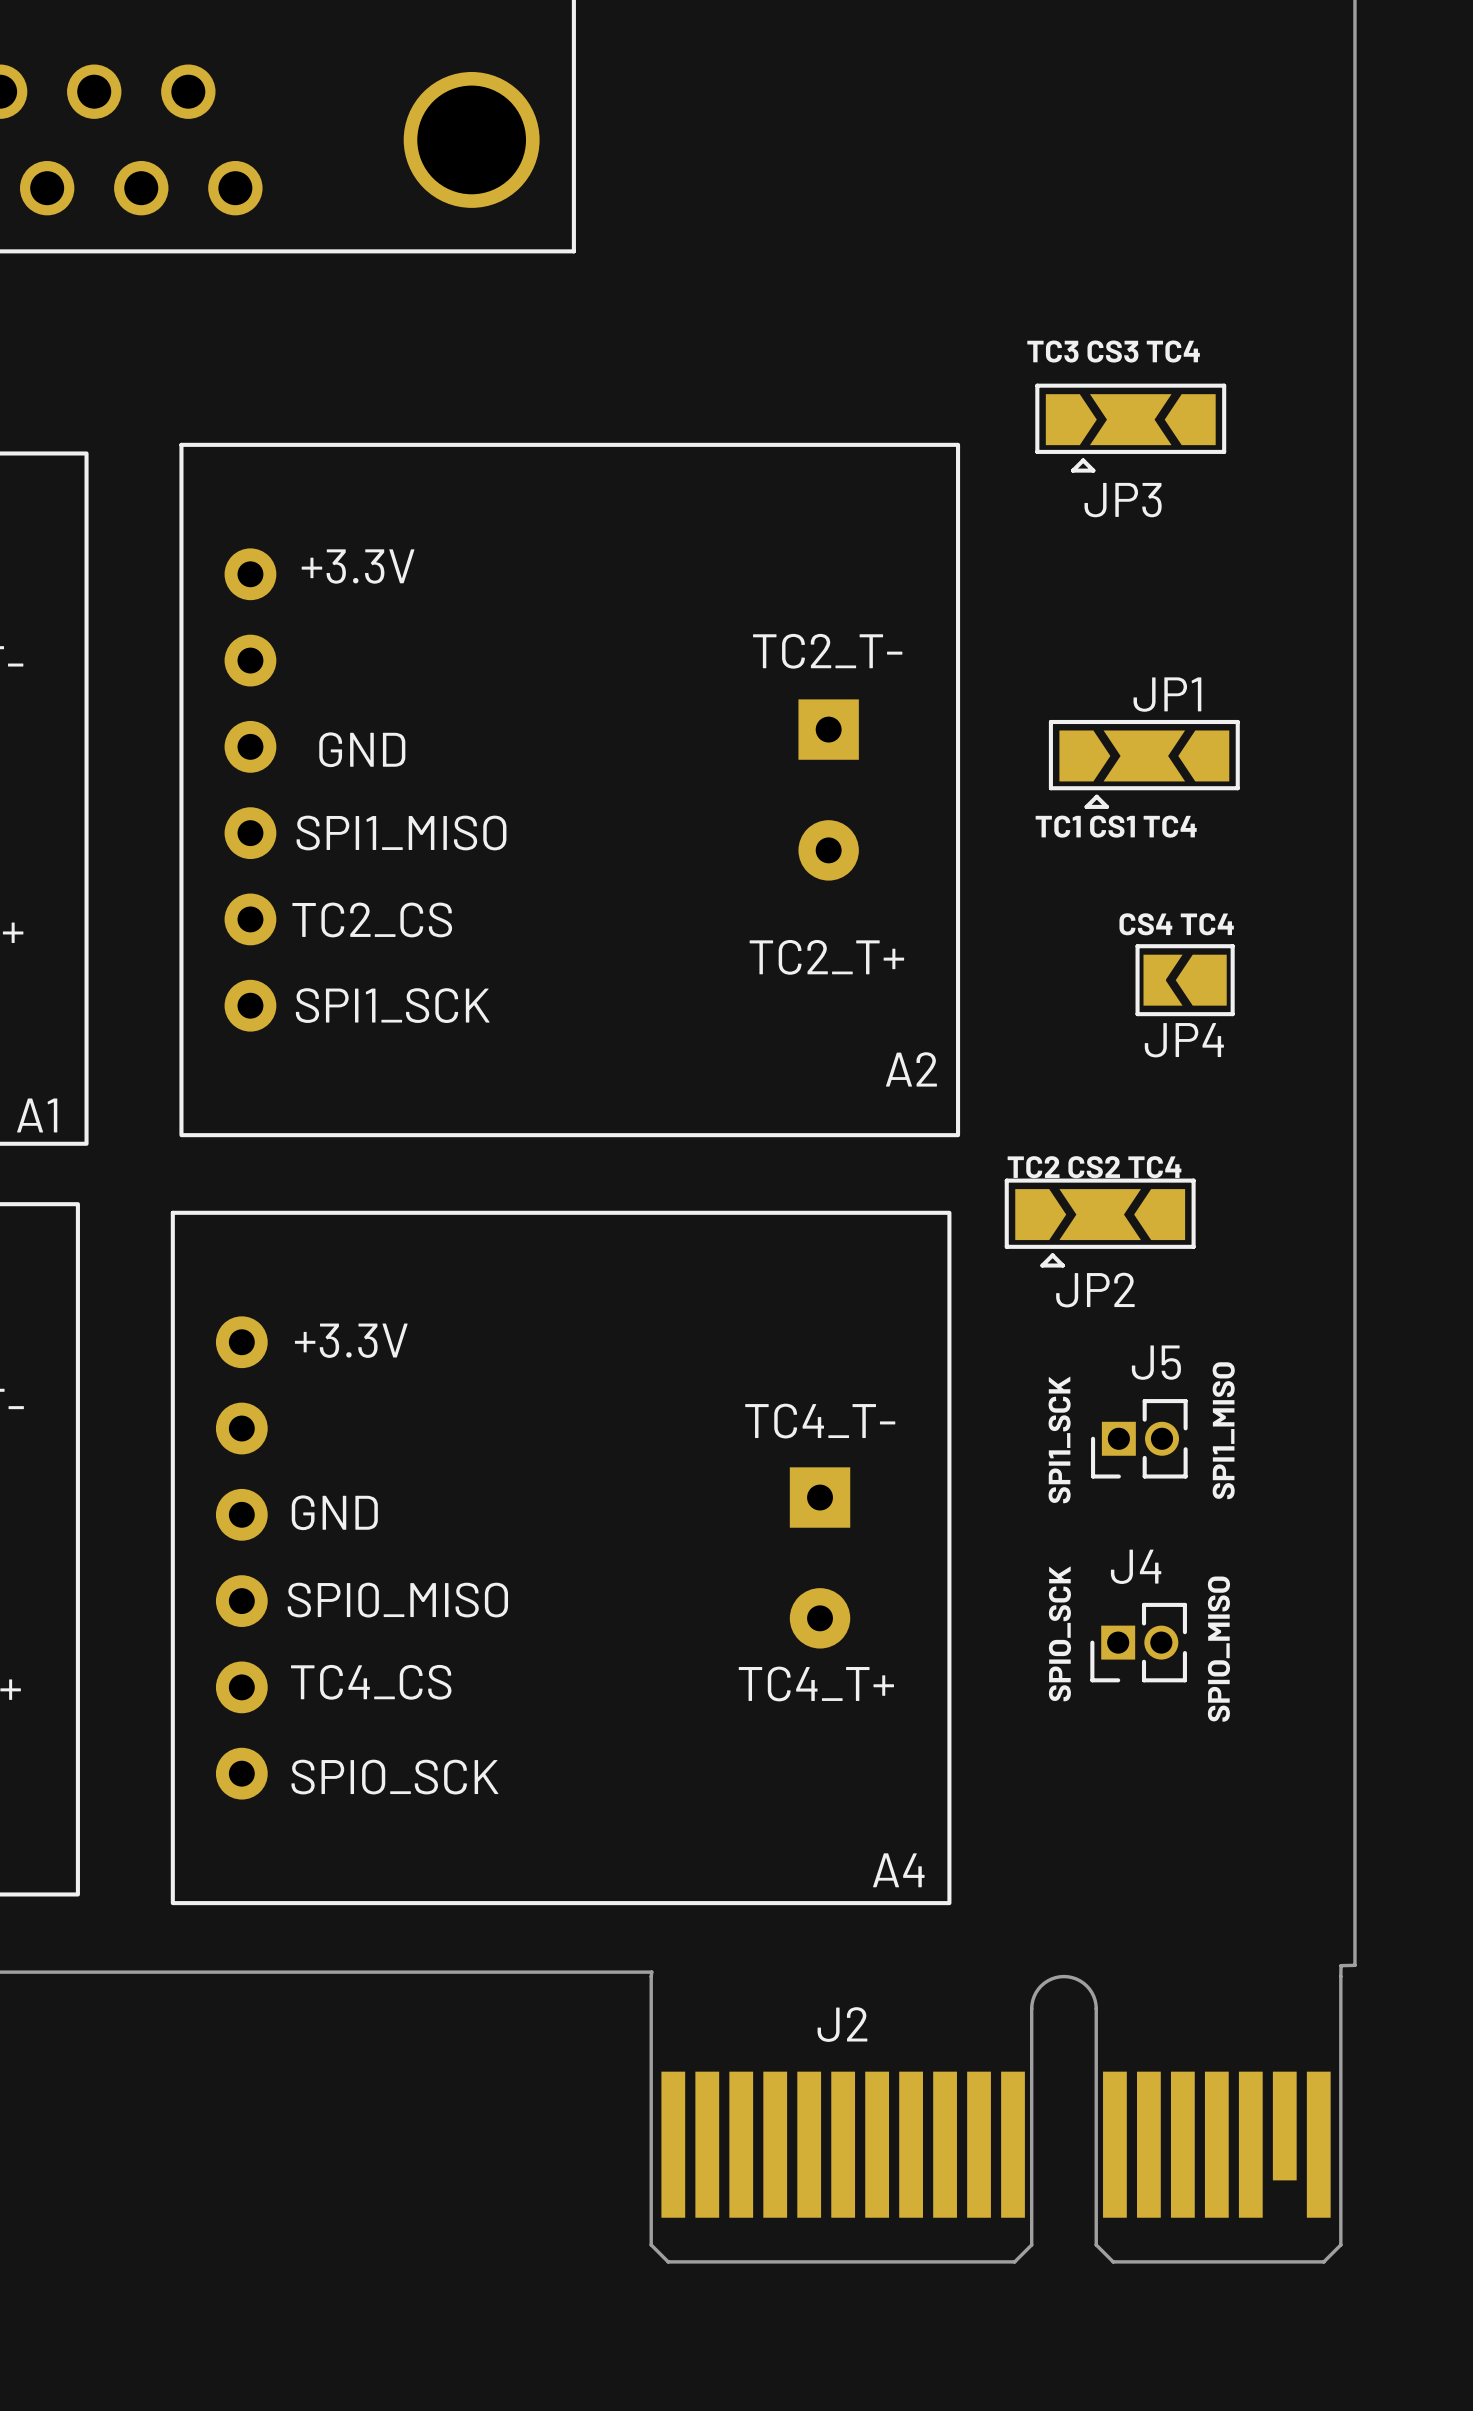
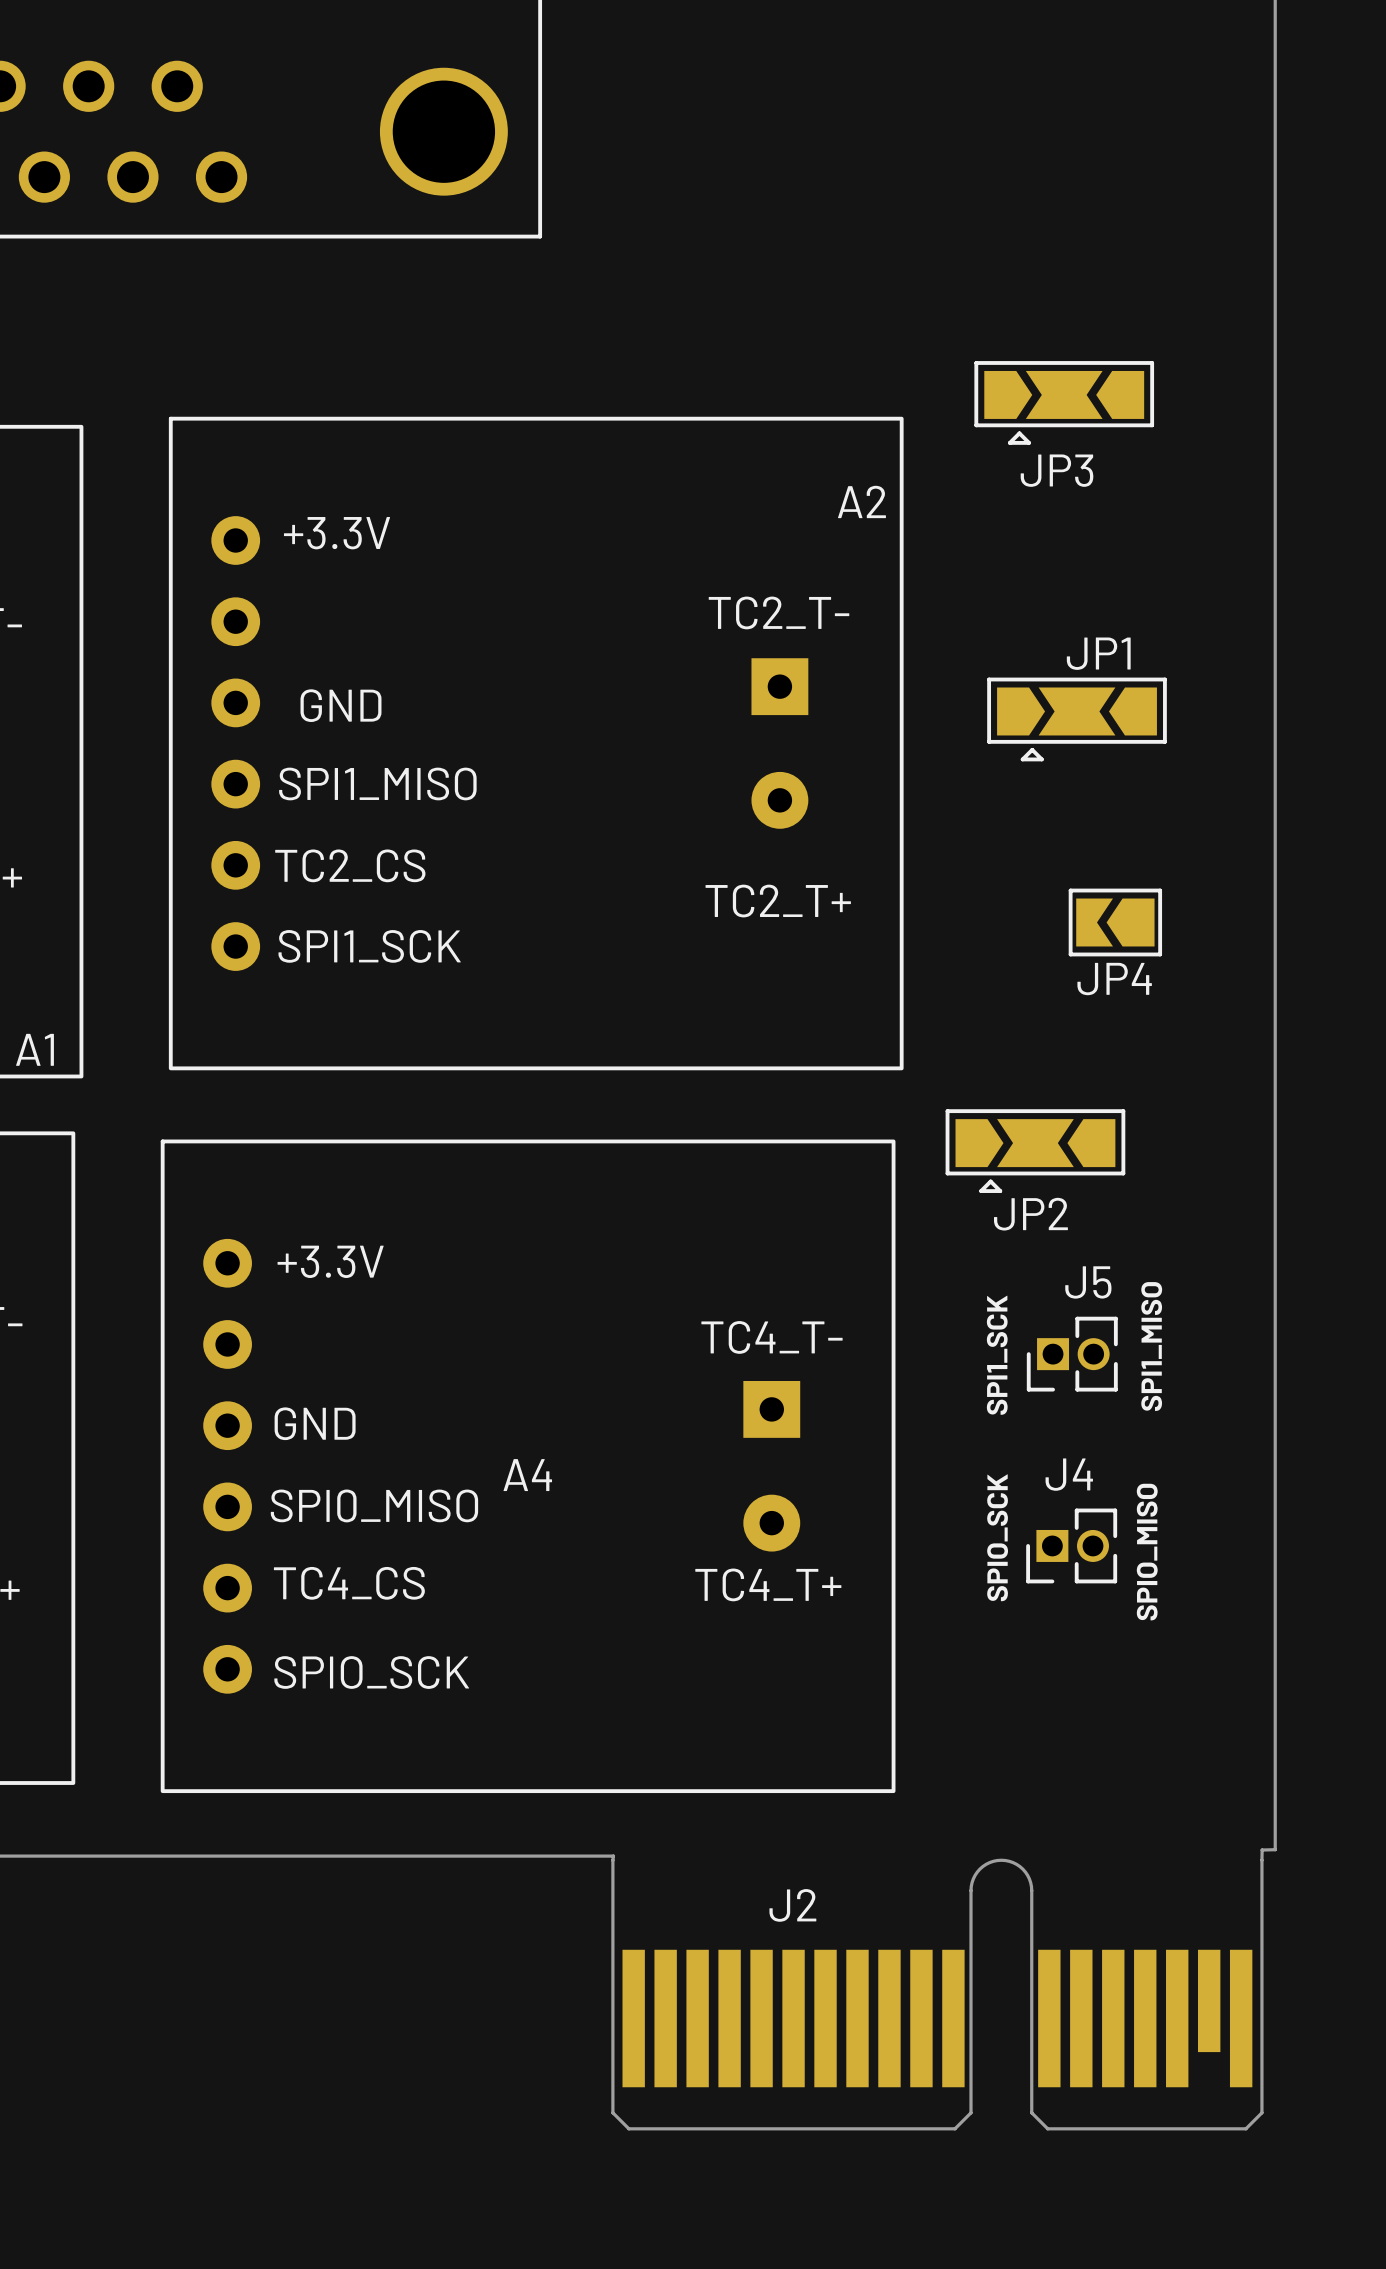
text: TC3 CS3 TC4 (1113, 351) -> none
text: TC1 CS1 TC4 (1116, 826) -> none
text: CS4 TC4 (1176, 924) -> none
A2 name position: A2 (911, 1069) -> A2 (861, 501)
text: TC2 CS2 TC4 (1094, 1167) -> none
A4 name position: A4 (898, 1870) -> A4 (527, 1475)

